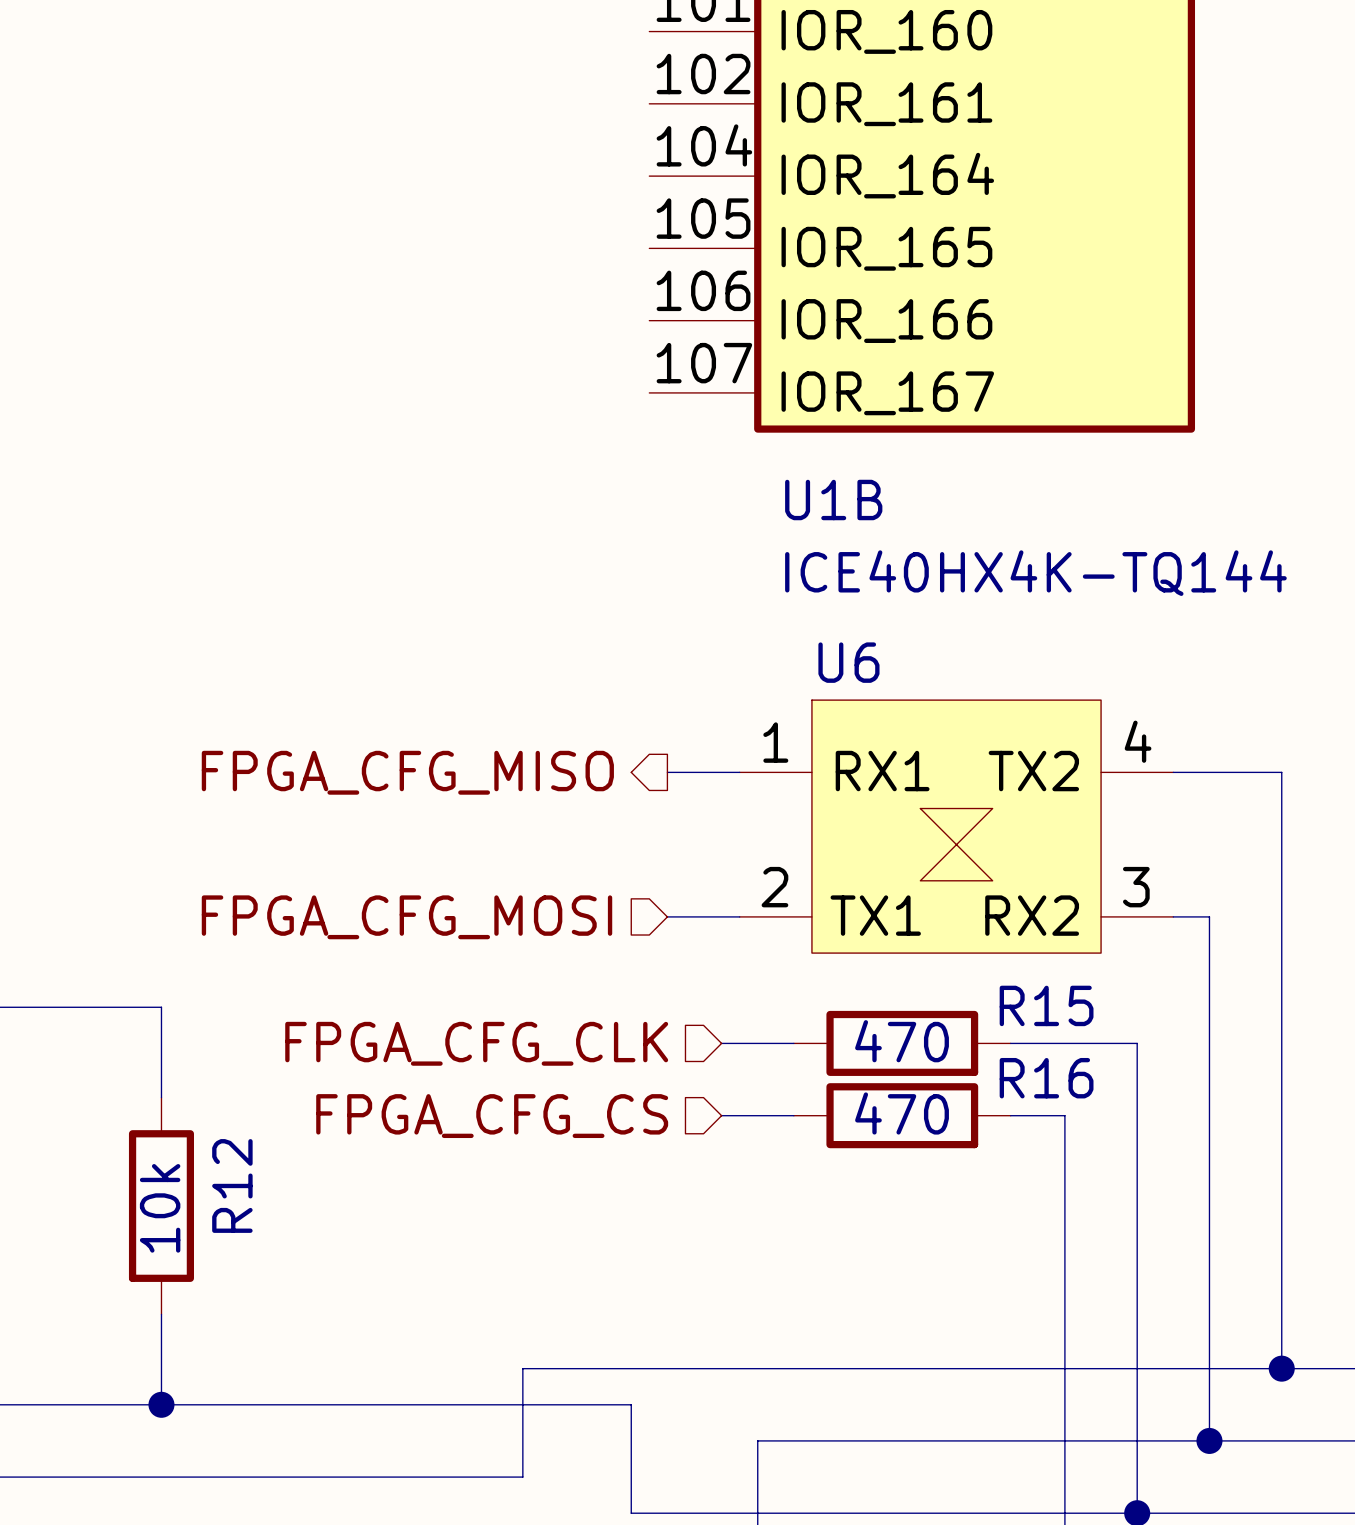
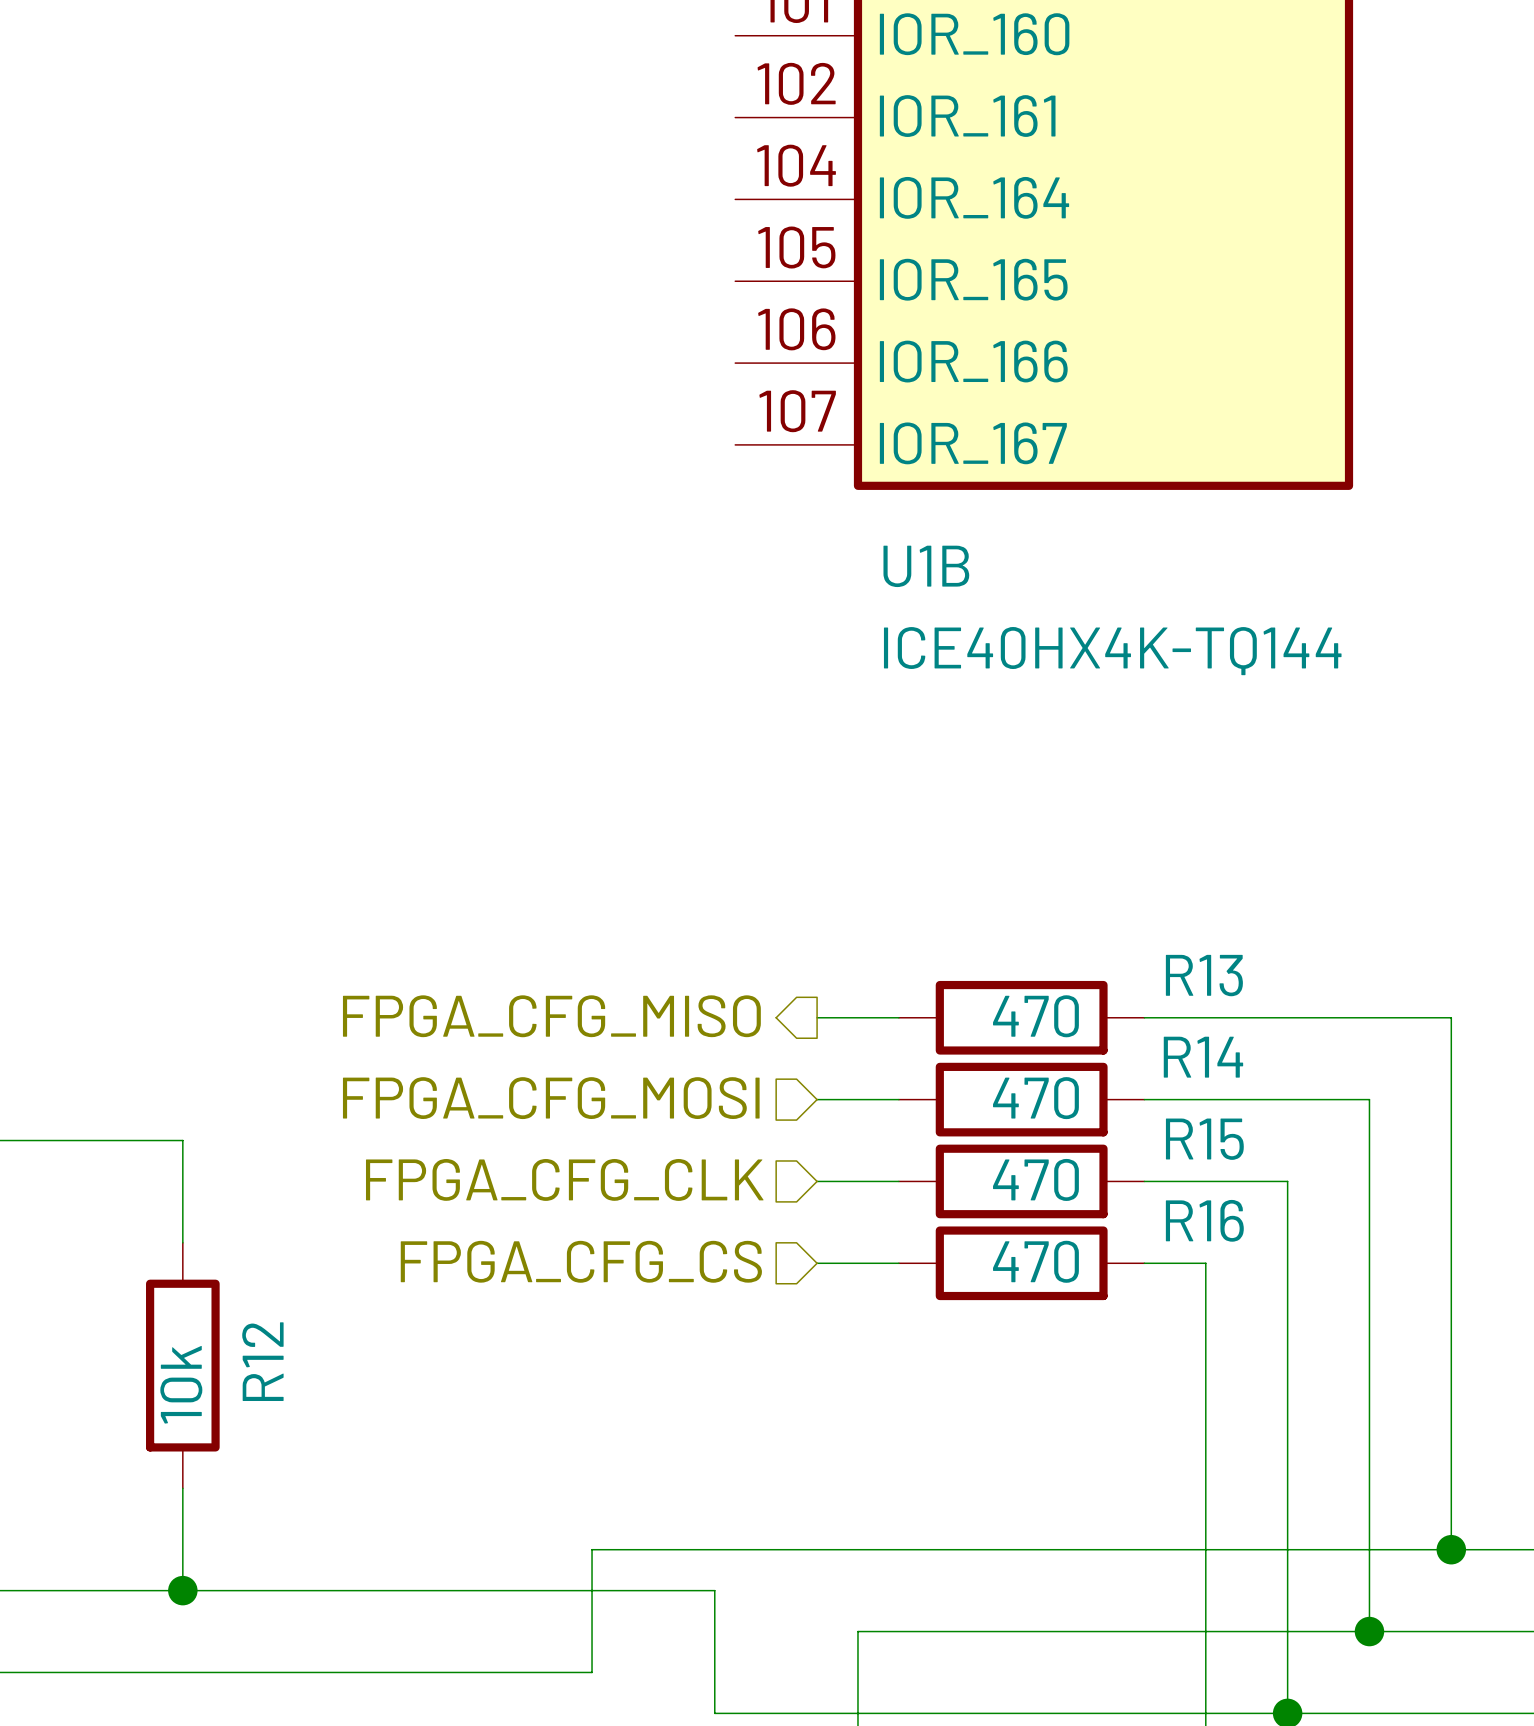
hierarchical label position: FPGA_CFG_MISO (407, 772) -> FPGA_CFG_MISO (551, 1016)
wire: (667, 772) (739, 772) -> (817, 1099) (898, 1099)
wire: (1173, 772) (1281, 772) (1281, 898) -> (1144, 1017) (1451, 1017)
U6: (956, 826) -> none
R13: none -> 470 (1021, 1017)
wire: (667, 916) (739, 916) -> (817, 1017) (898, 1017)
wire: (1173, 916) (1209, 916) (1209, 971) -> (1144, 1099) (1369, 1099)
hierarchical label position: FPGA_CFG_MOSI (406, 917) -> FPGA_CFG_MOSI (551, 1098)
R14: none -> 470 (1021, 1099)

